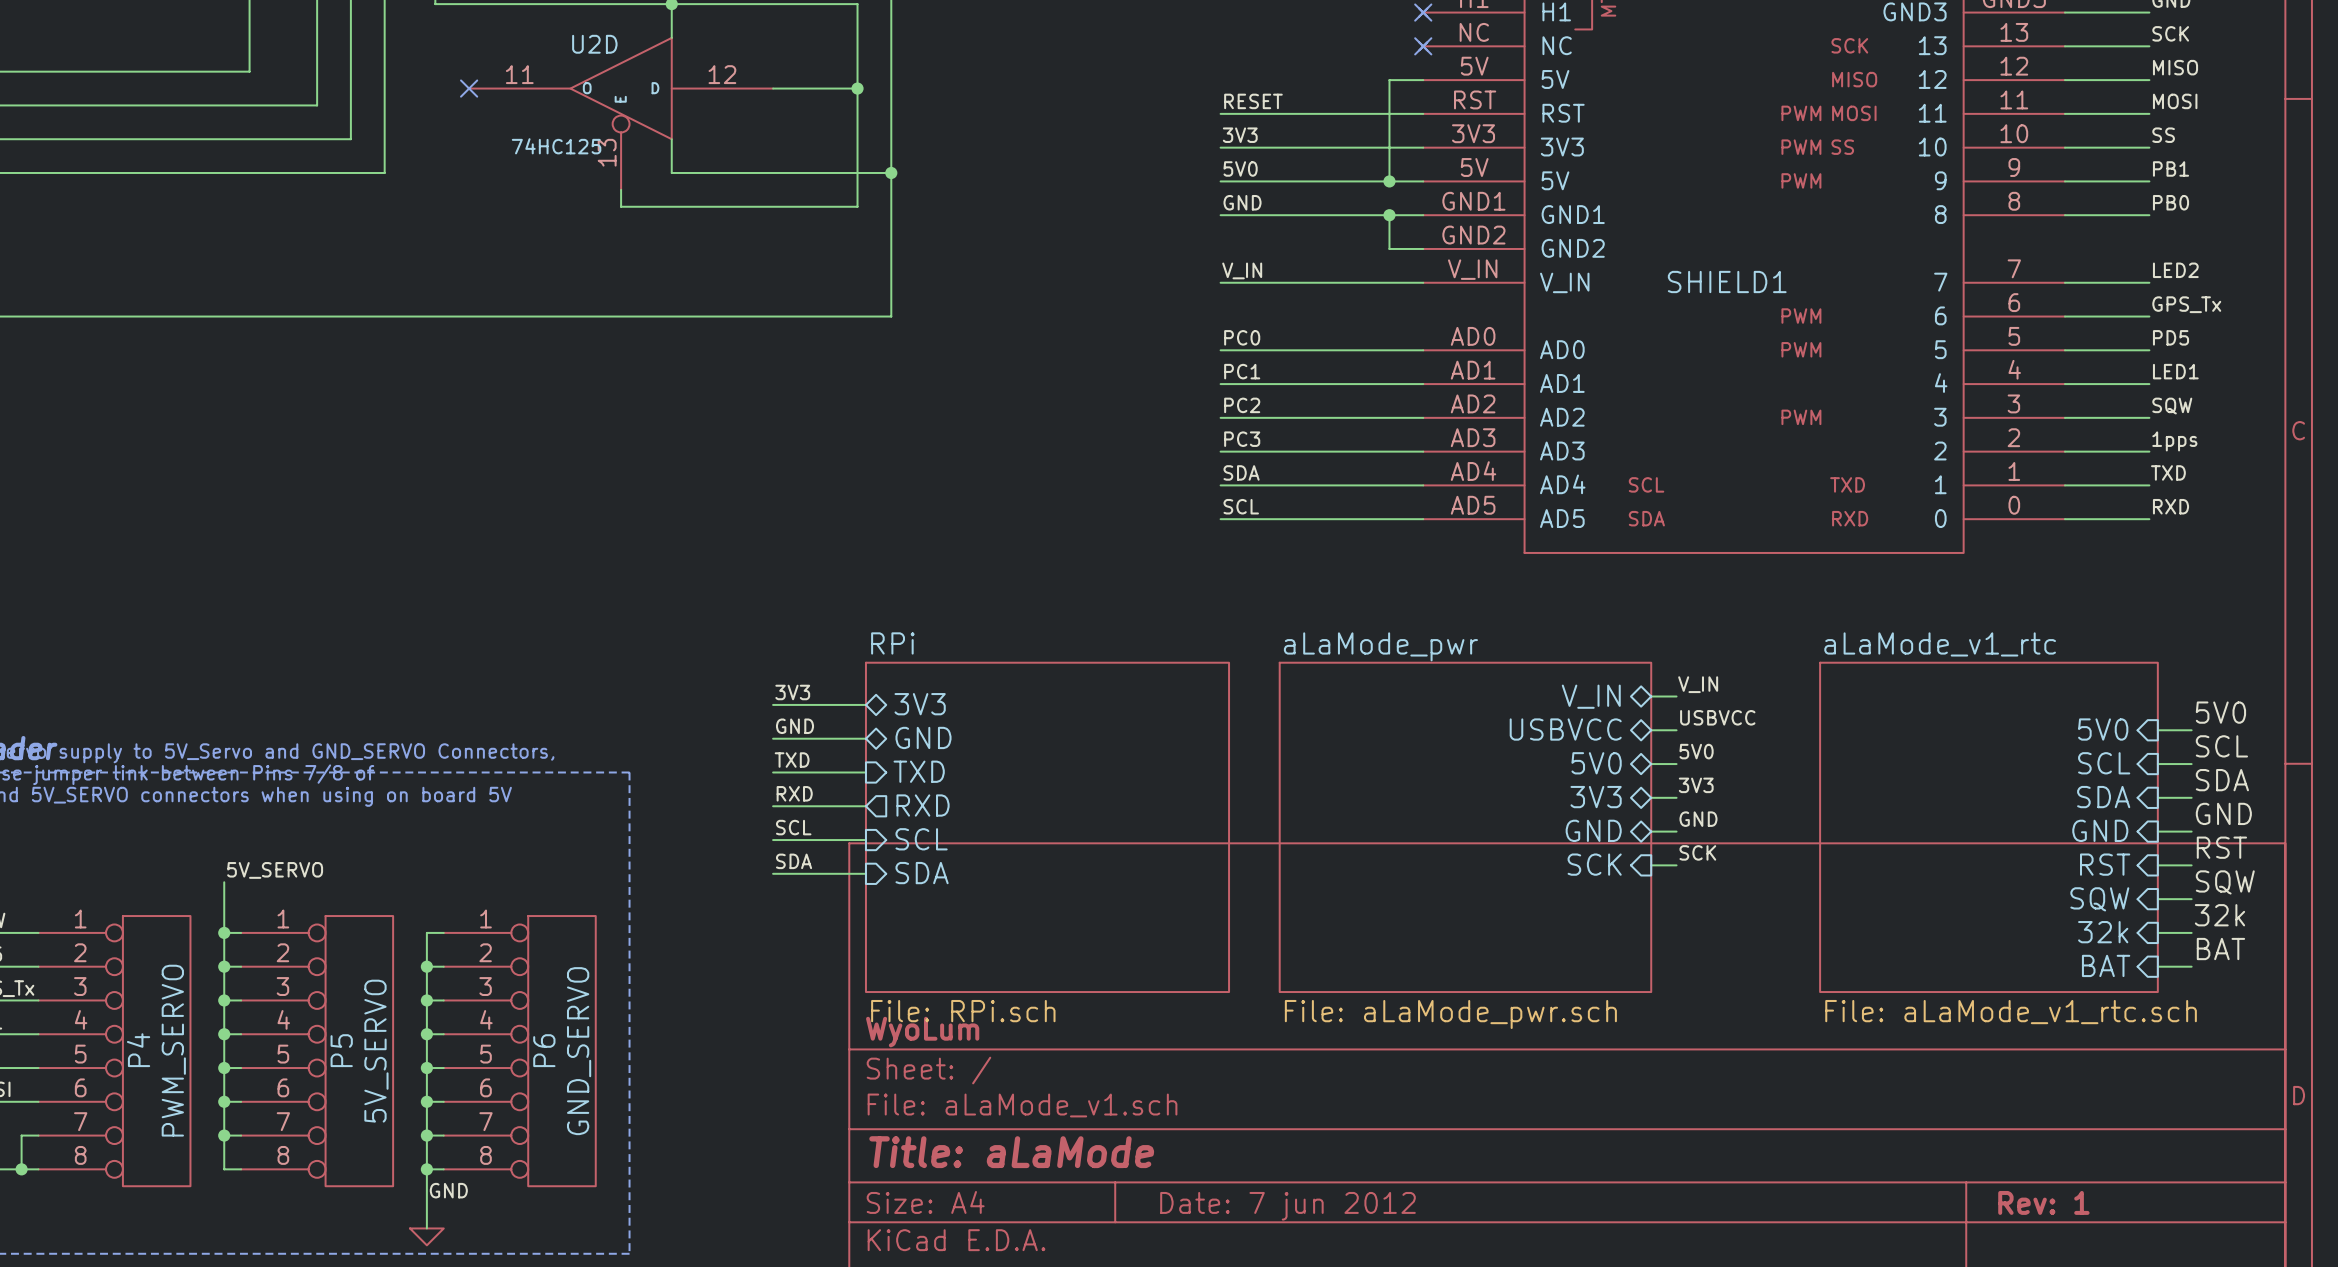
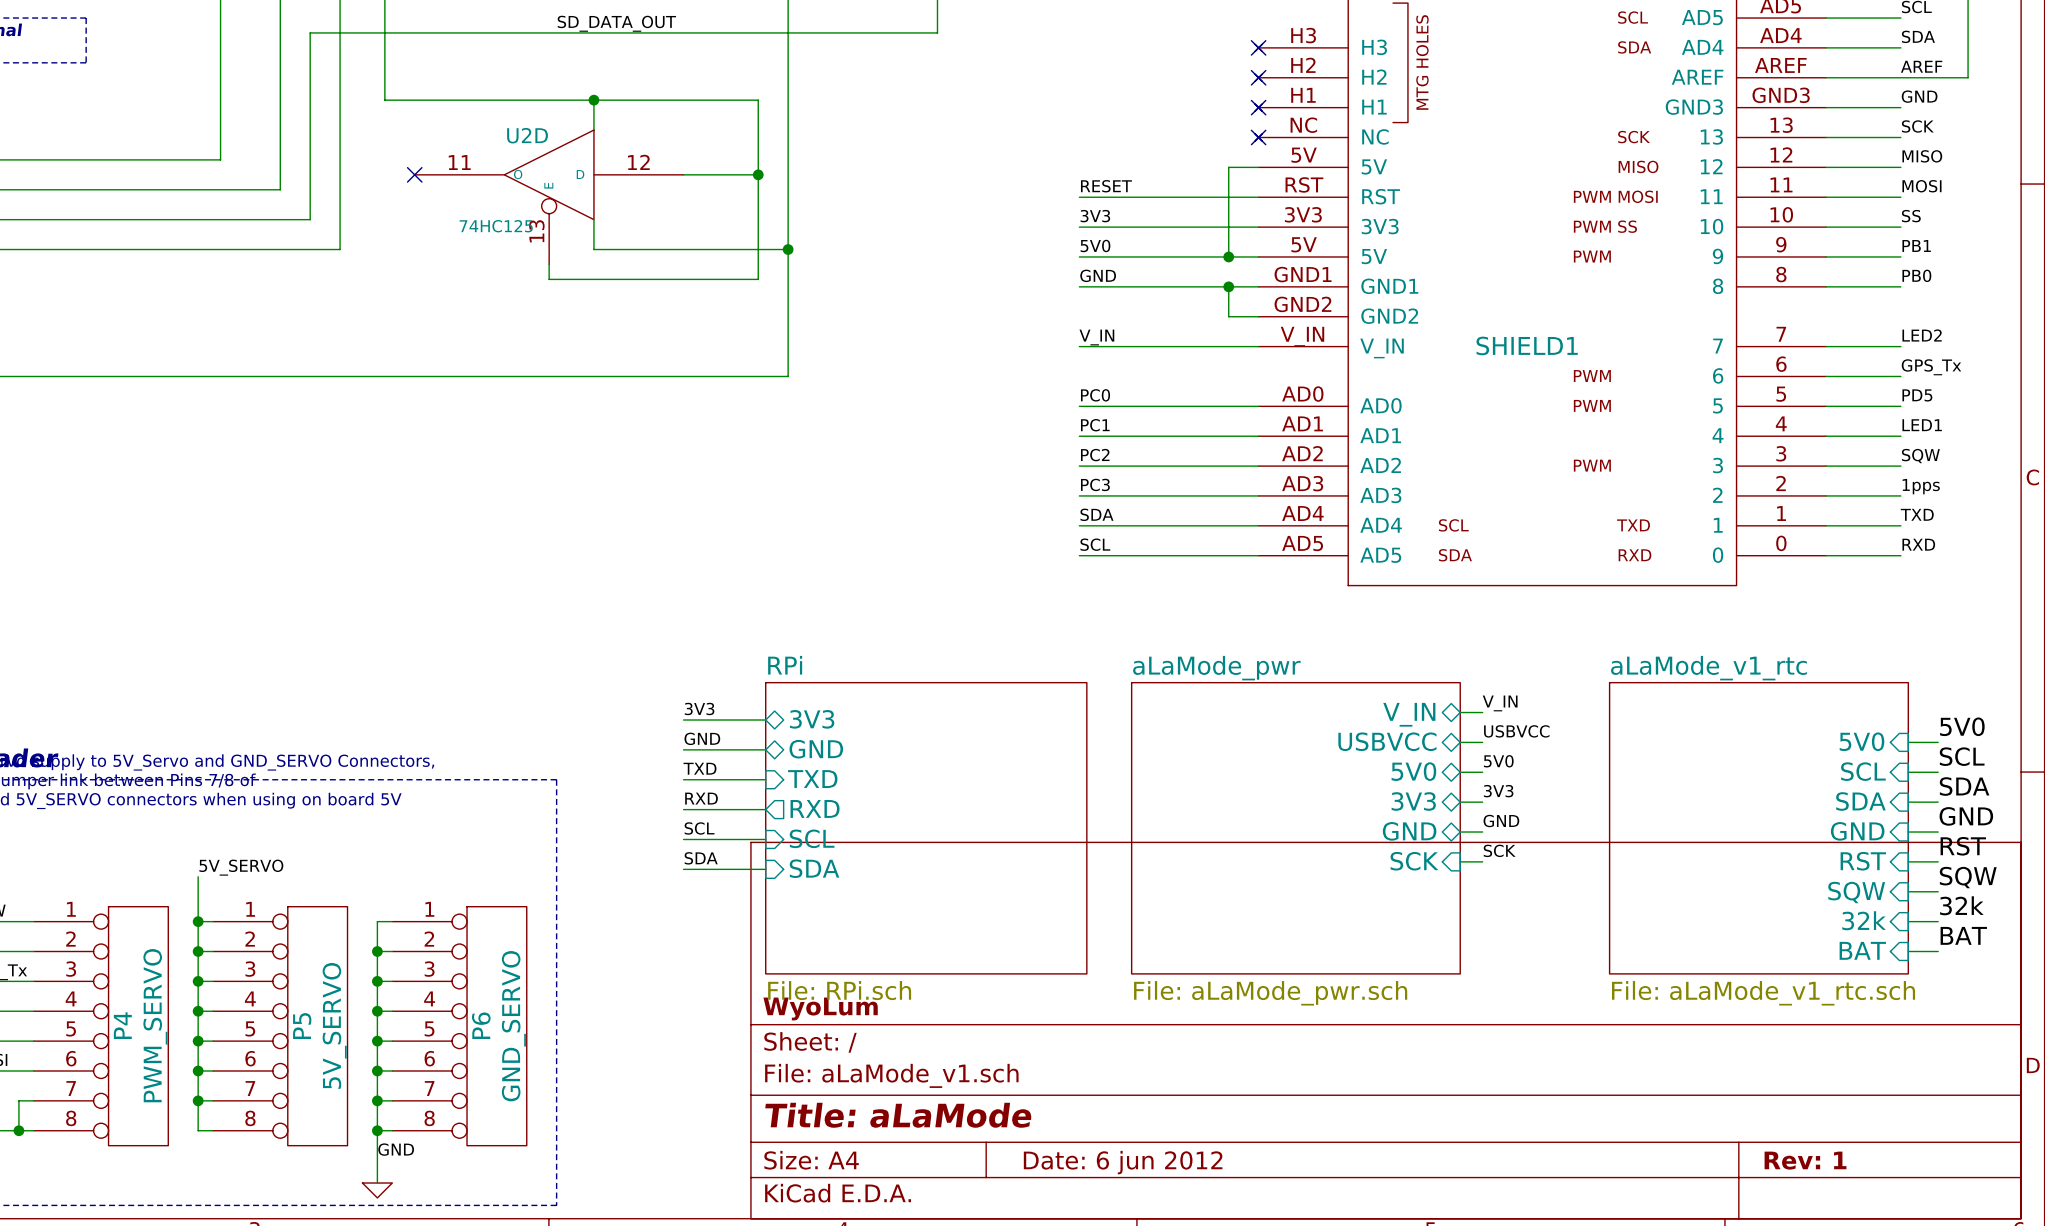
title block: Date: 7 jun 2012 (1287, 1206) -> Date: 6 jun 2012 (1123, 1162)

